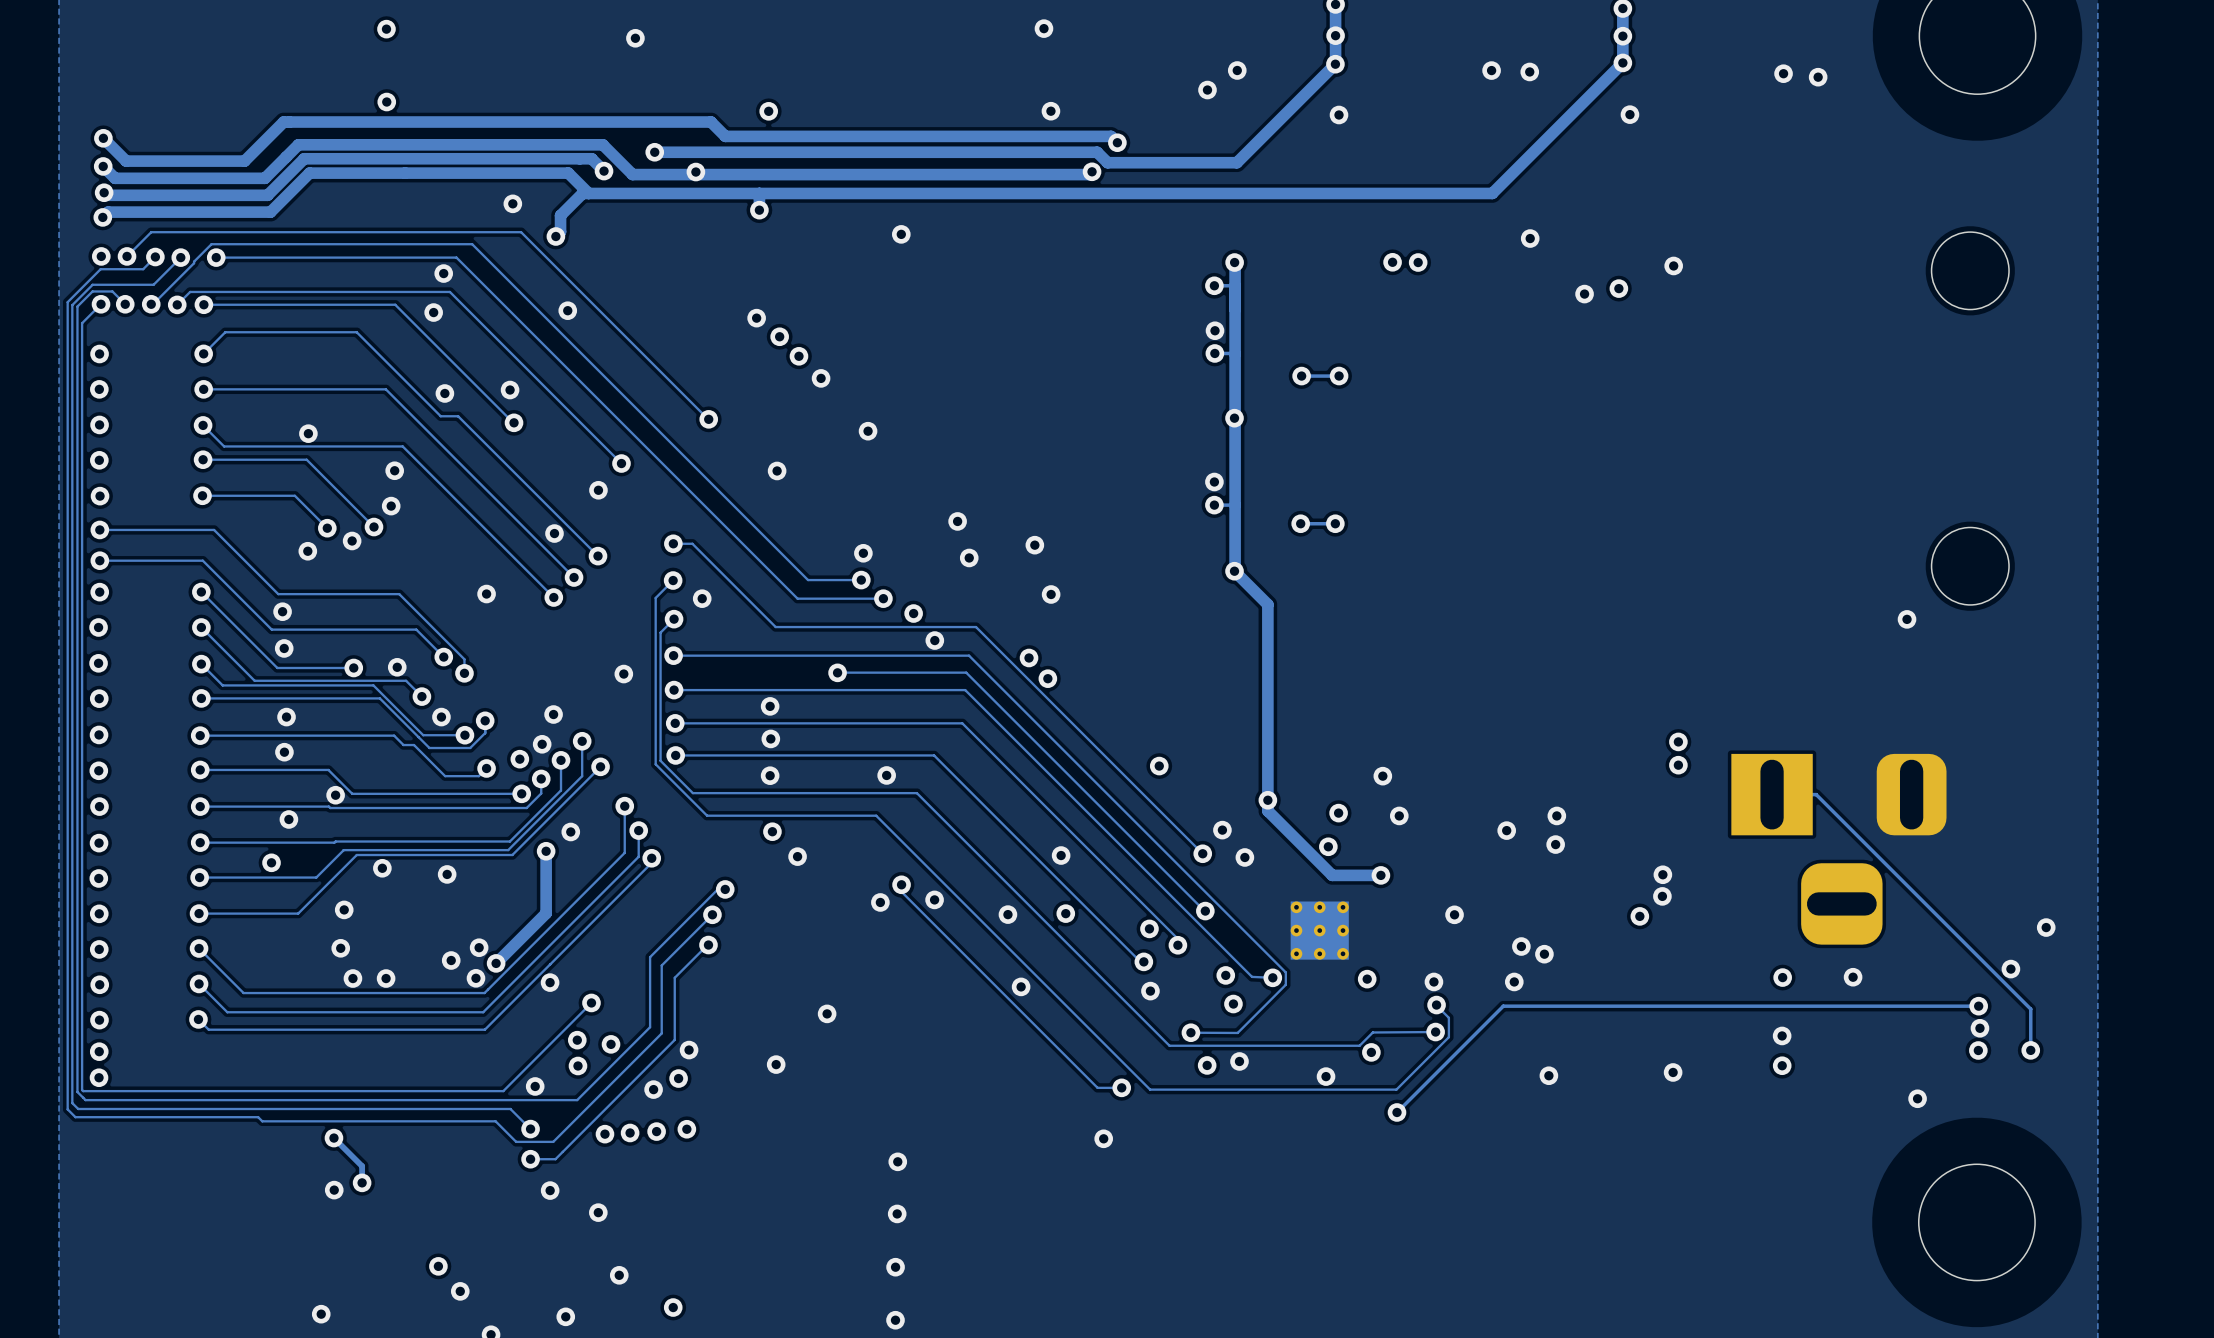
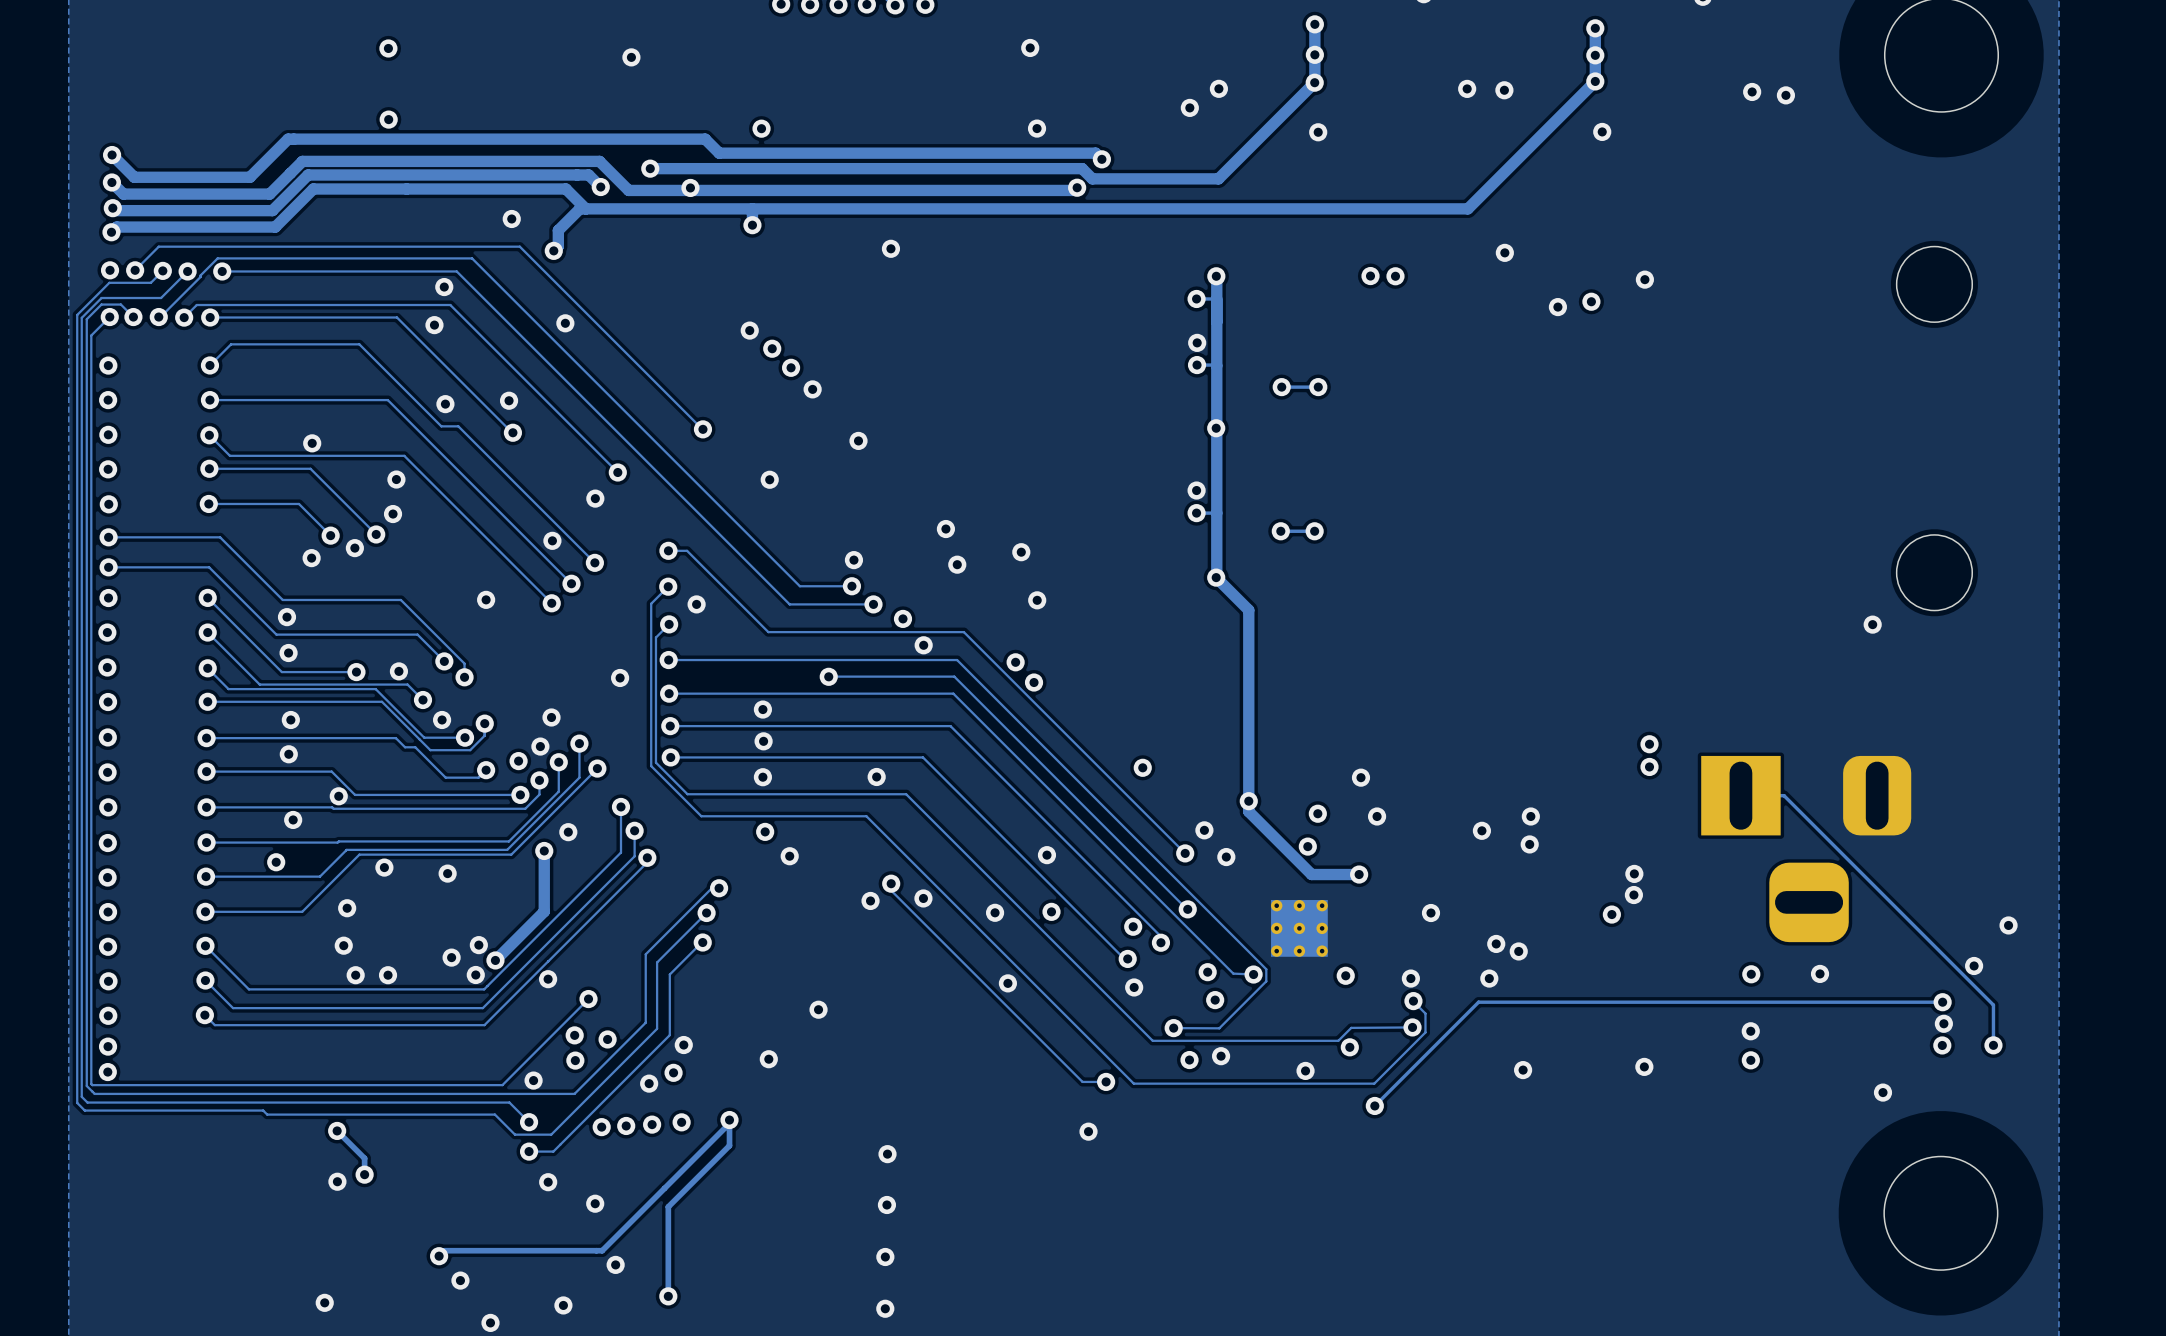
track: none -> (729, 1120) (729, 1145) (668, 1206) (668, 1296) (664, 1292)
via: none -> (729, 1120)
track: none -> (731, 1121) (602, 1250) (444, 1250) (439, 1256)

